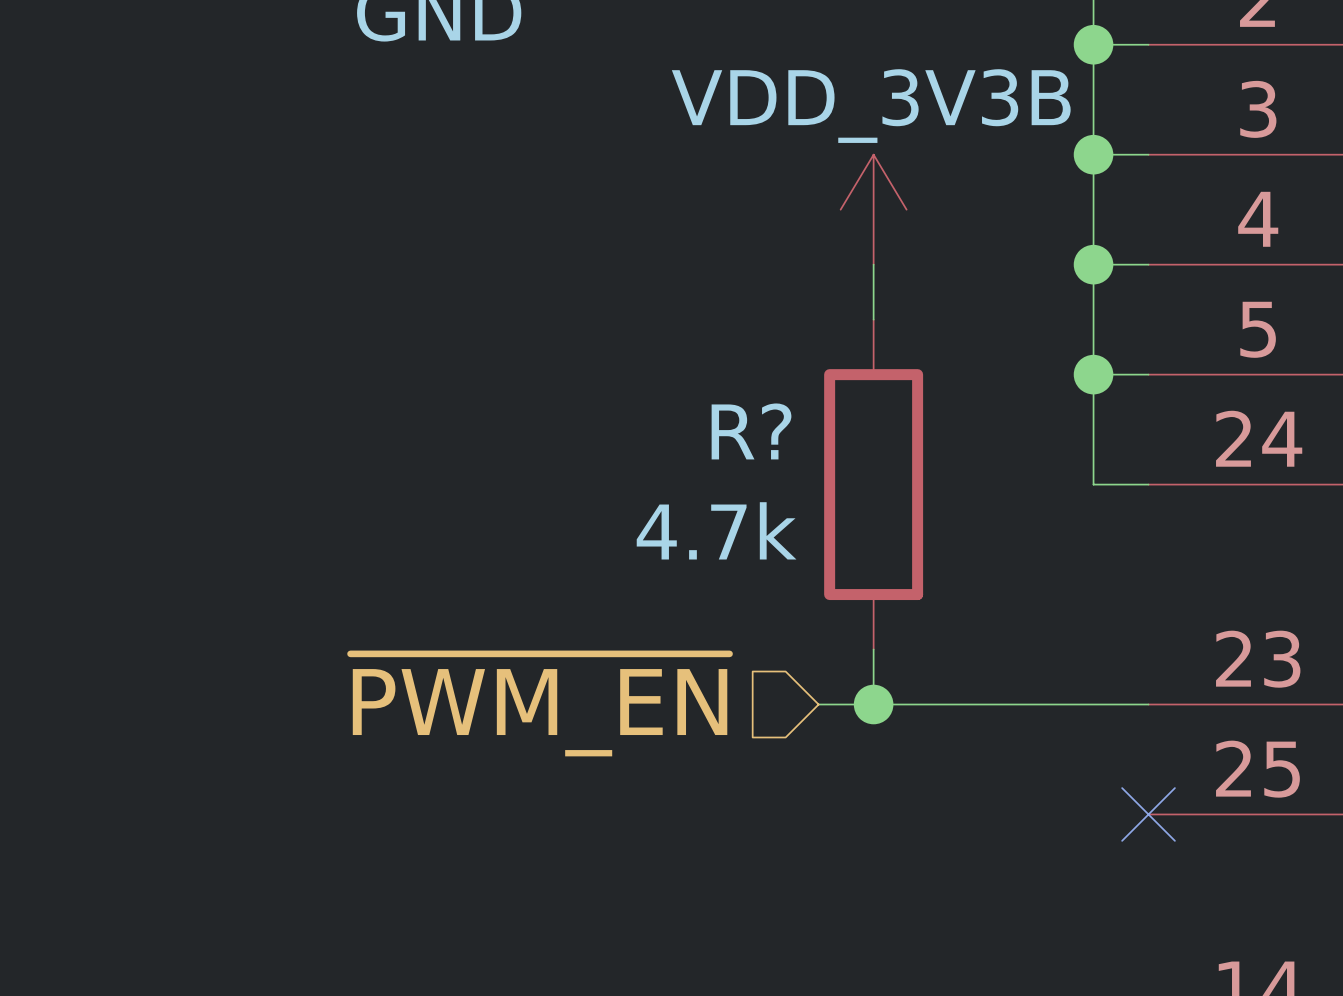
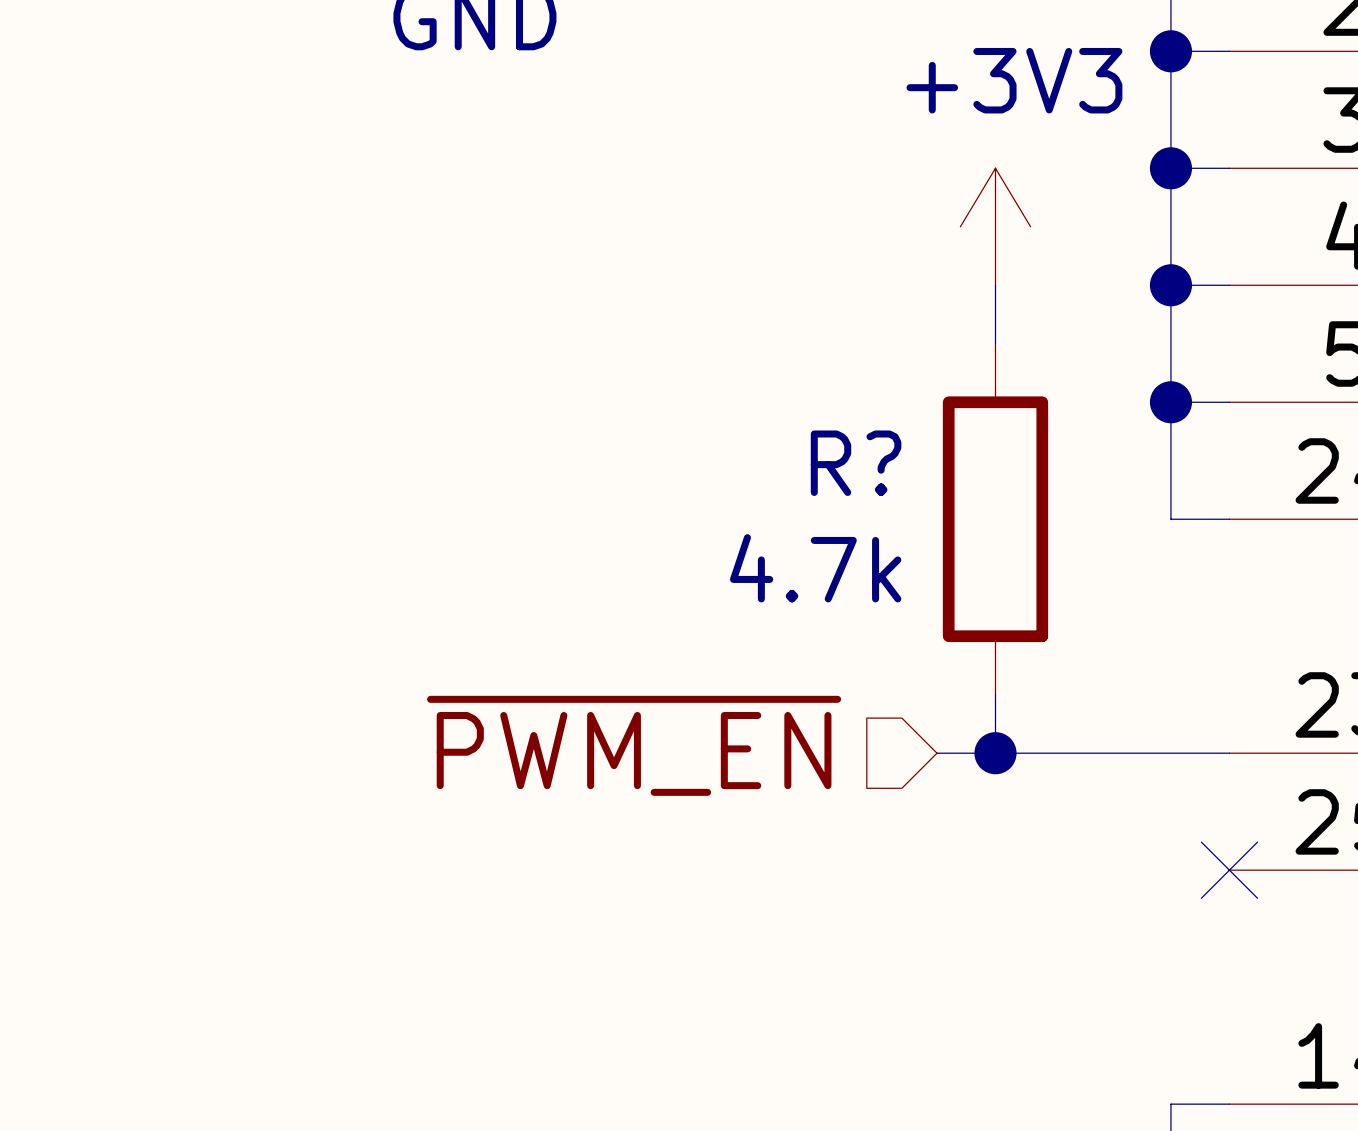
power symbol: VDD_3V3B (873, 209) -> none
power symbol: none -> +3V3 (995, 226)
wire: (873, 264) (873, 319) -> (995, 285) (995, 343)
R? position: (873, 484) -> (995, 519)
wire: (873, 649) (873, 704) (818, 704) -> none
wire: none -> (995, 694) (995, 753)
junction position: (873, 704) -> (995, 753)
hierarchical label position: ~{PWM_EN} (540, 705) -> ~{PWM_EN} (634, 745)

